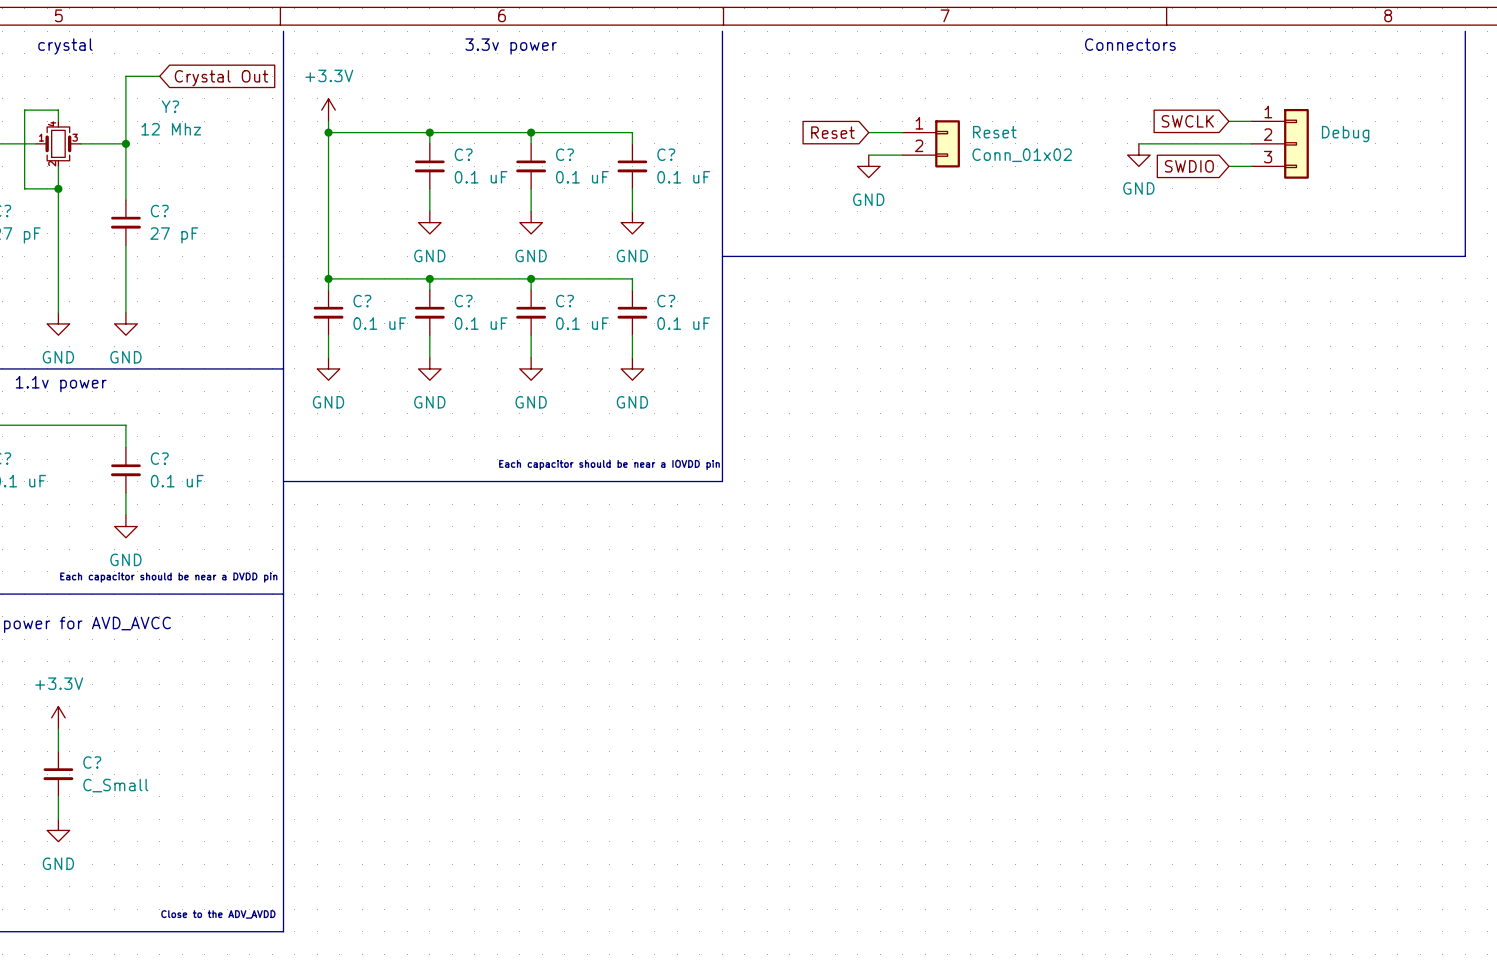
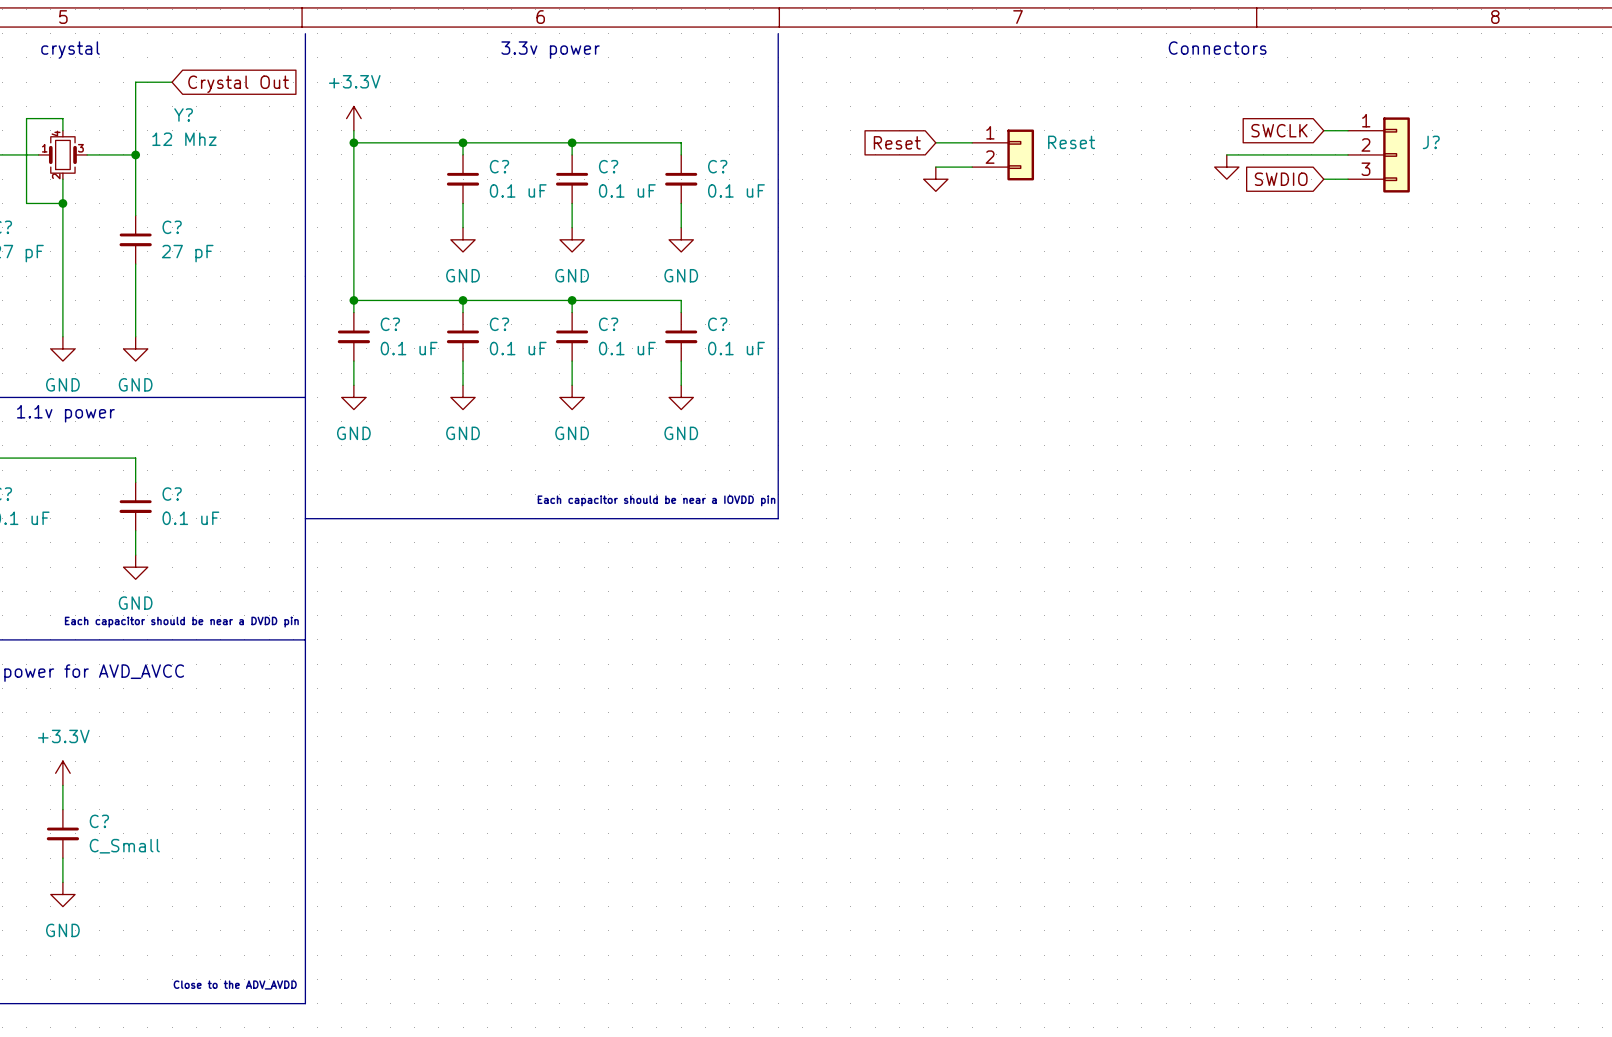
line: (1465, 31) (1465, 256) (722, 256) -> none
Debug name: Debug (1345, 134) -> J? (1431, 142)
Reset value: Conn_01x02 (1022, 155) -> none
power symbol text: GND (1138, 188) -> none
power symbol text: GND (868, 199) -> none

